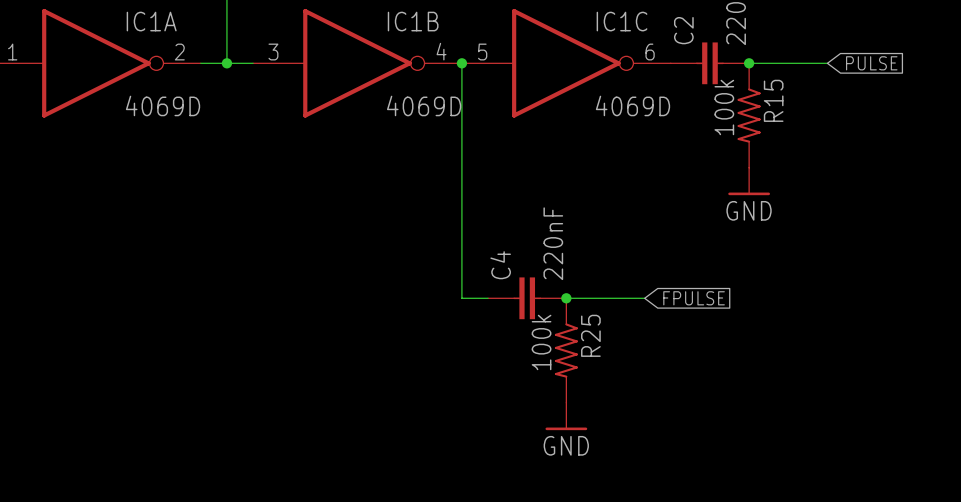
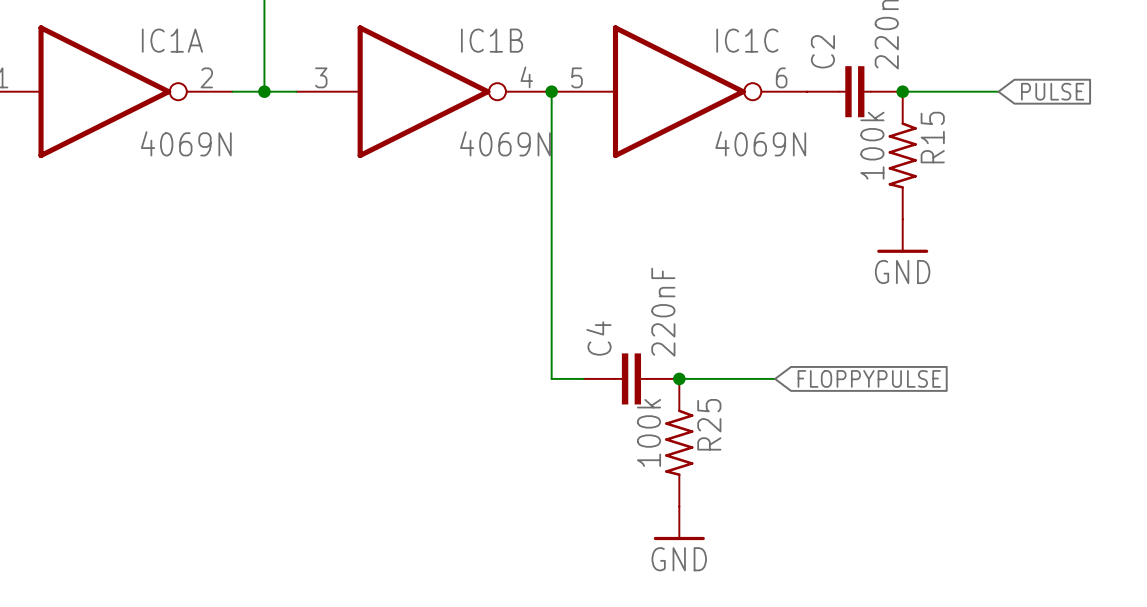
IC1A value: 4069D (163, 105) -> 4069N (186, 143)
IC1B value: 4069D (424, 105) -> 4069N (505, 143)
IC1C value: 4069D (632, 105) -> 4069N (760, 143)
global label: FPULSE (694, 298) -> FLOPPYPULSE (869, 378)

